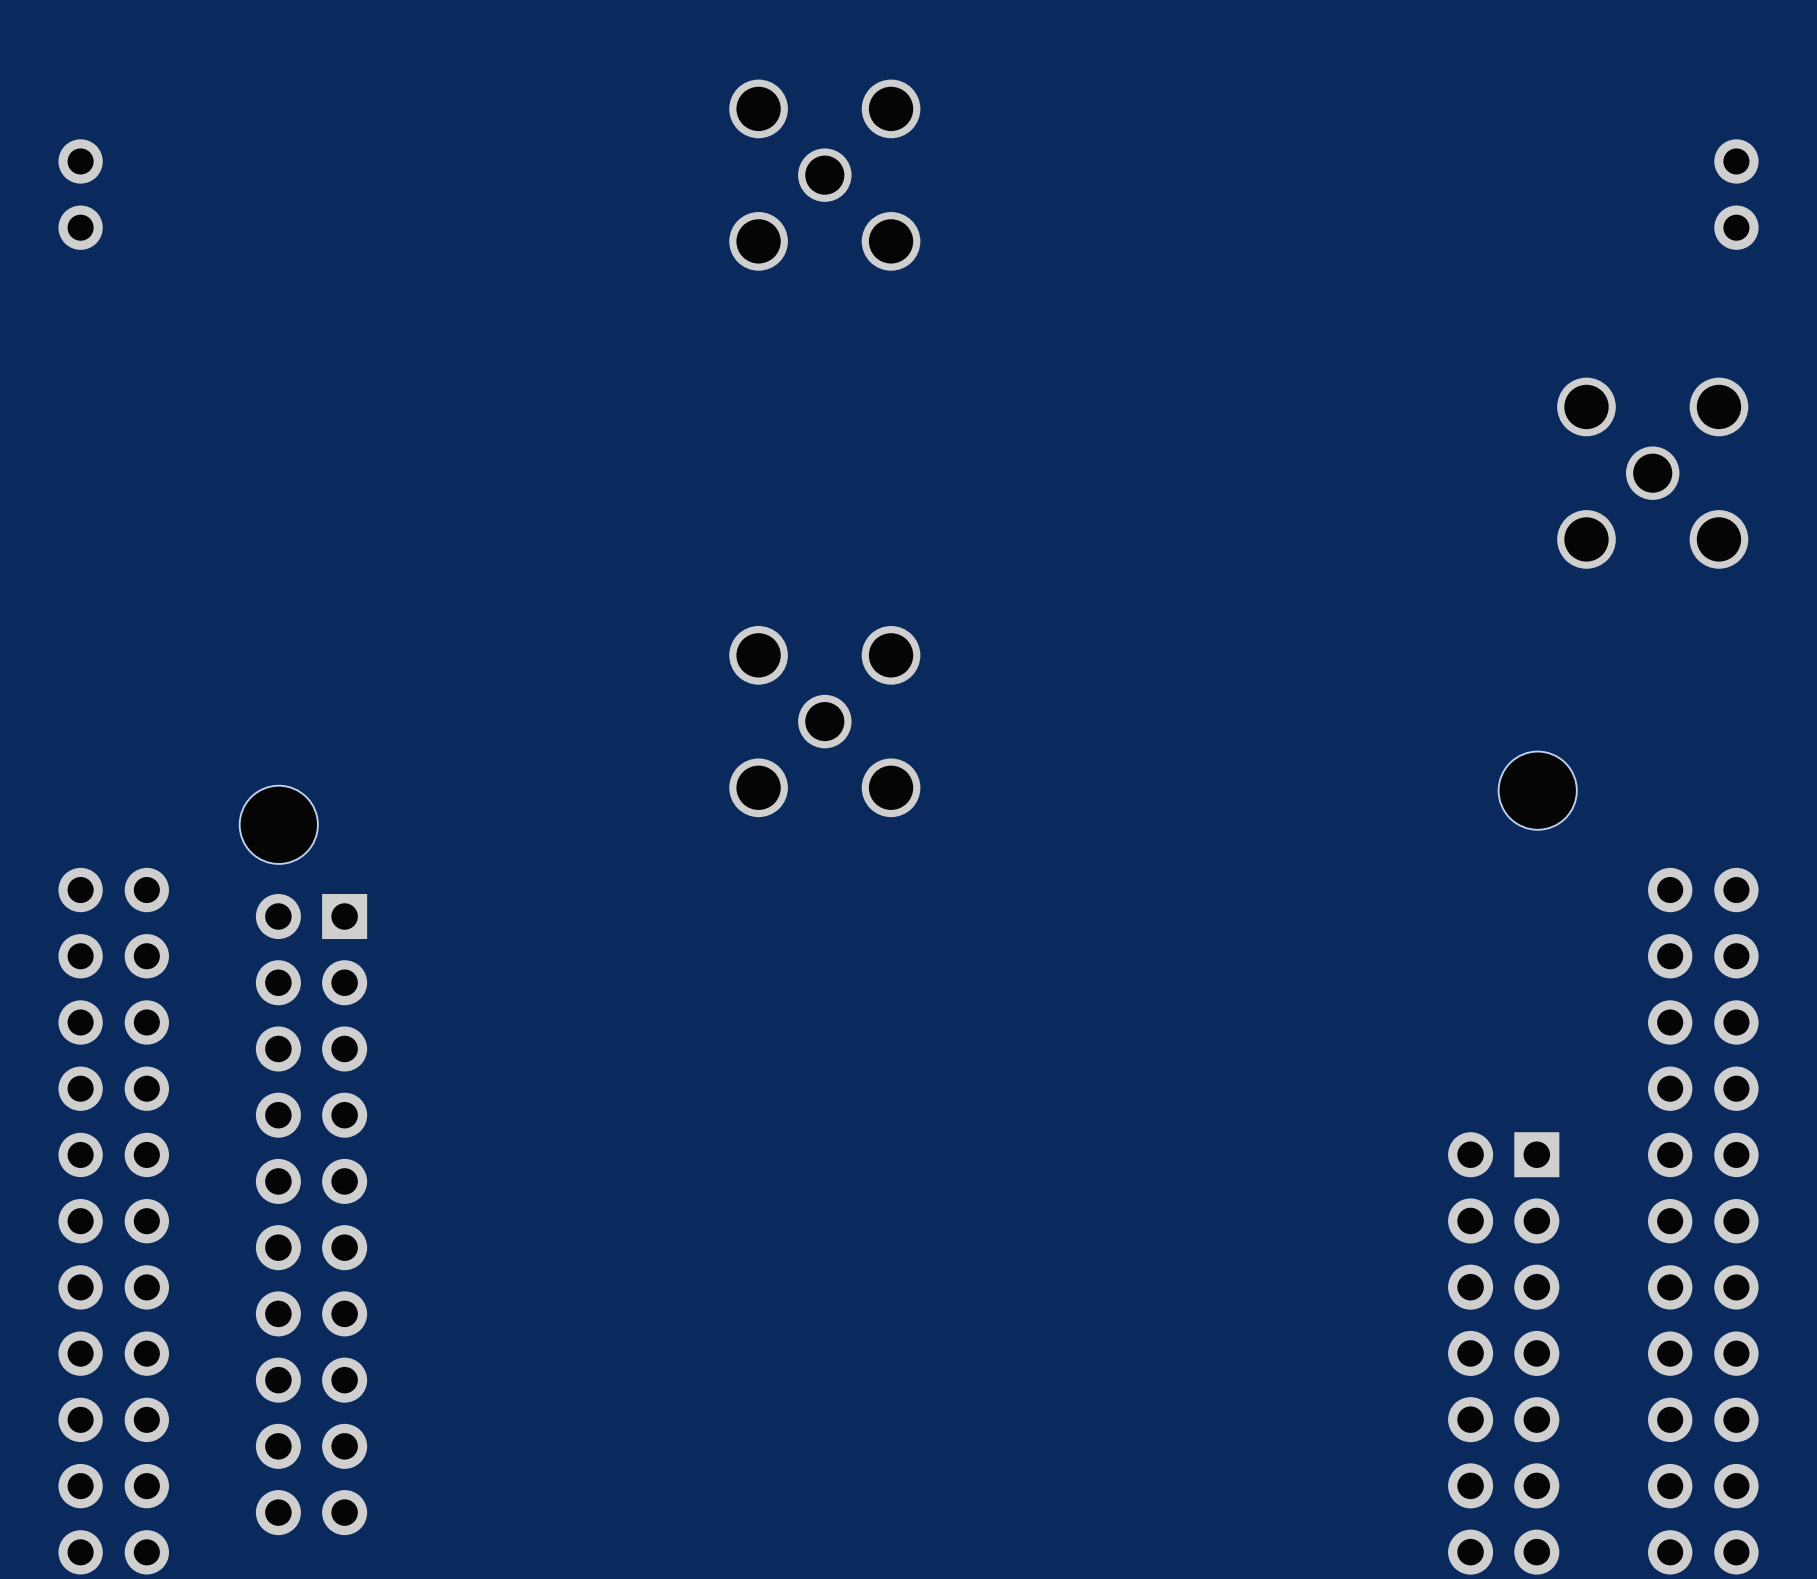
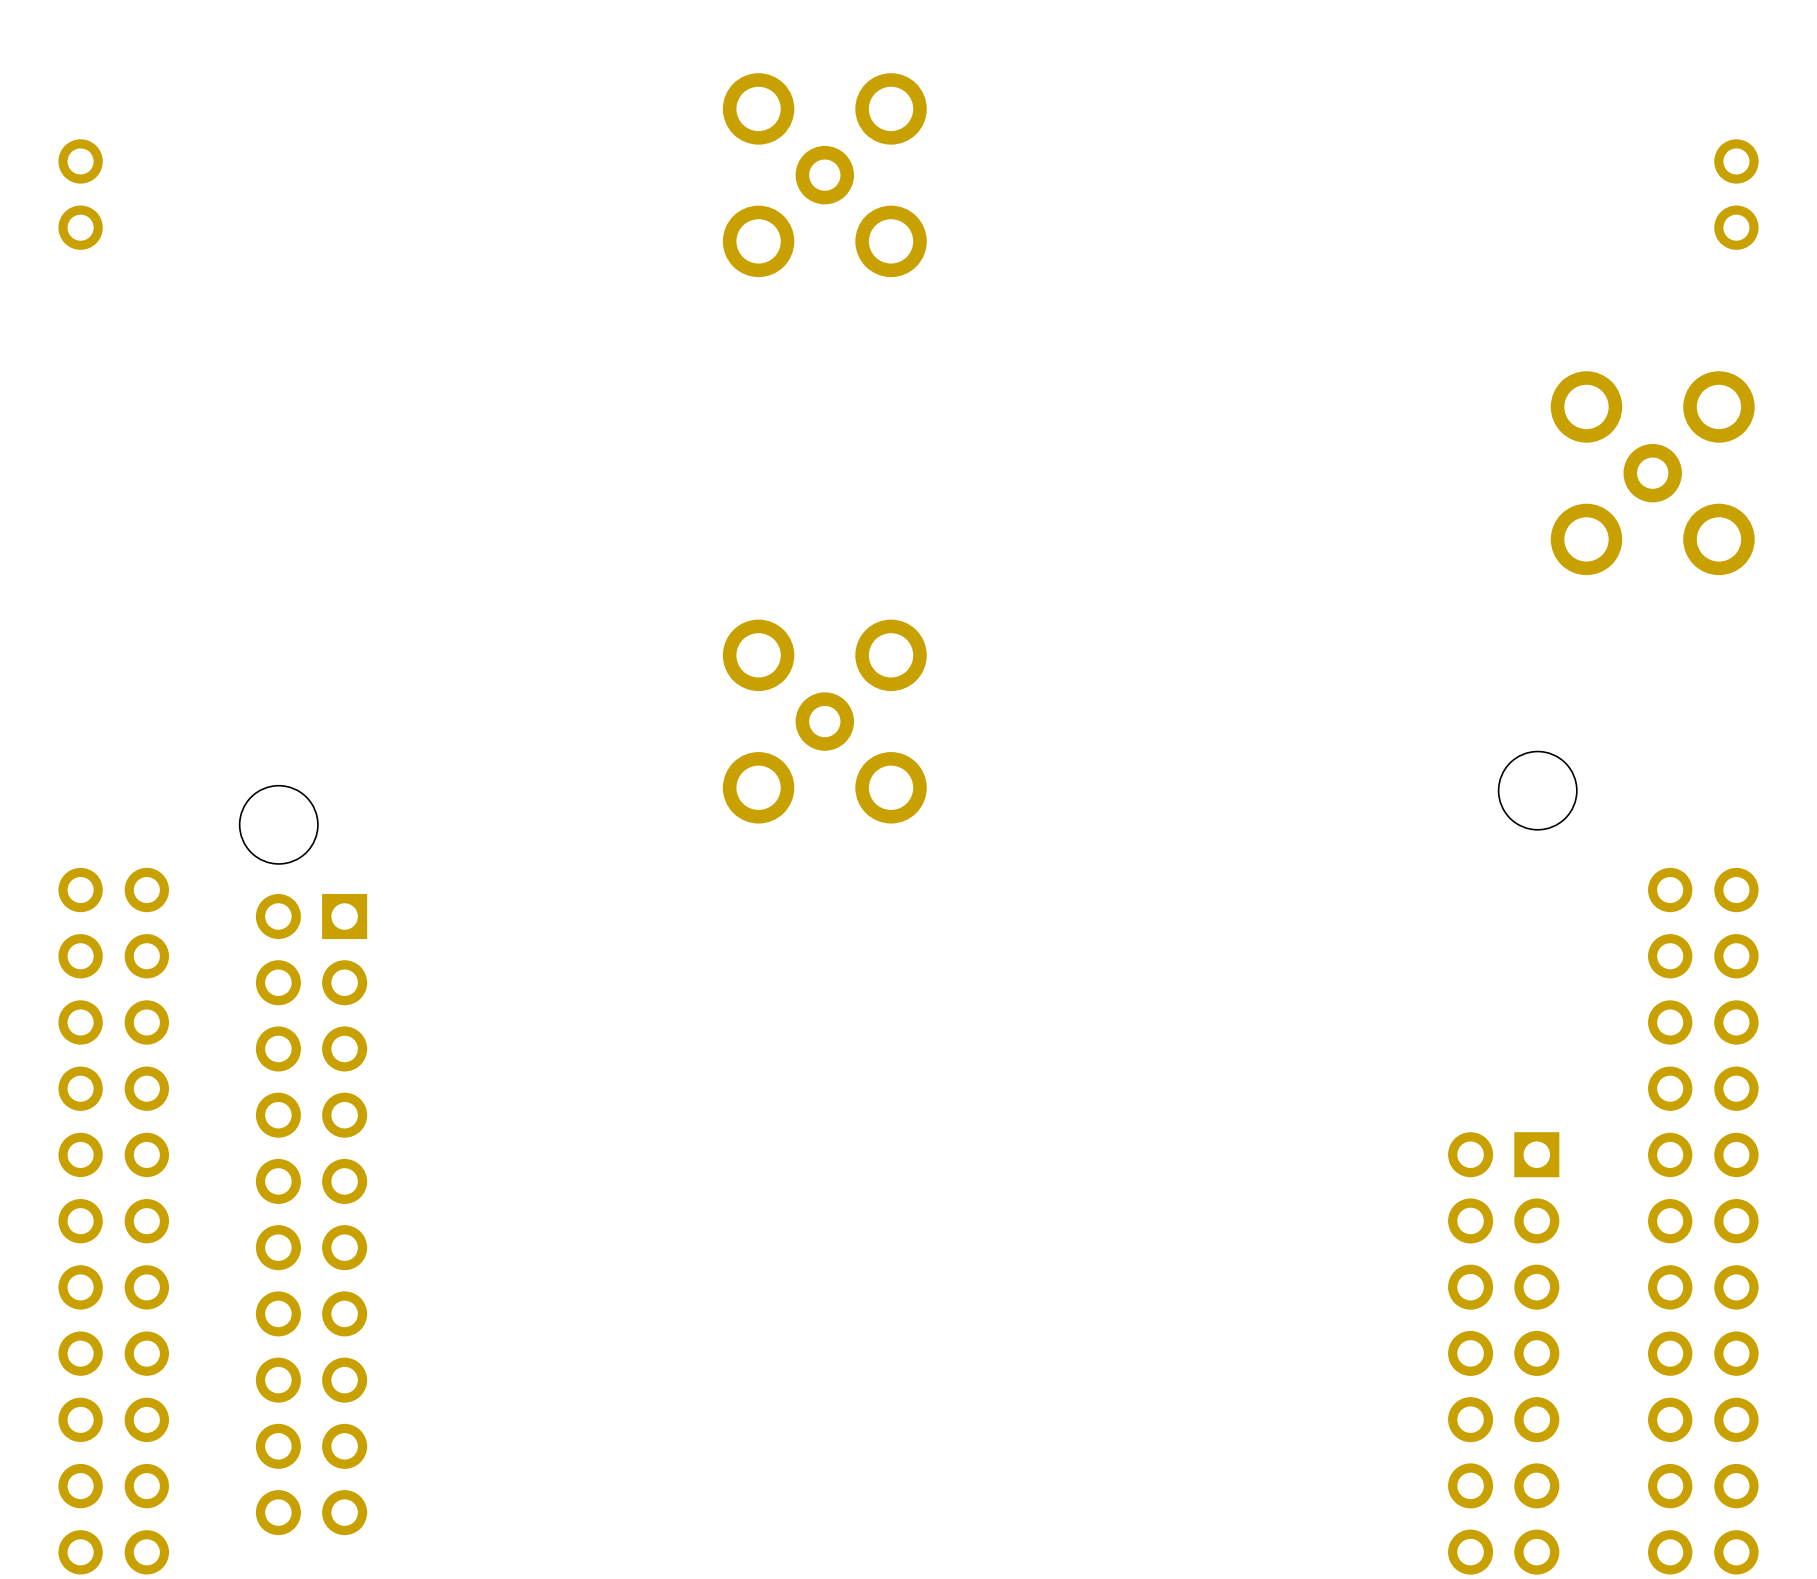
part footprint: [729, 79, 921, 271] -> [722, 73, 927, 278]
part footprint: [1557, 377, 1749, 569] -> [1550, 371, 1755, 576]
part footprint: [729, 626, 921, 818] -> [722, 619, 927, 824]

